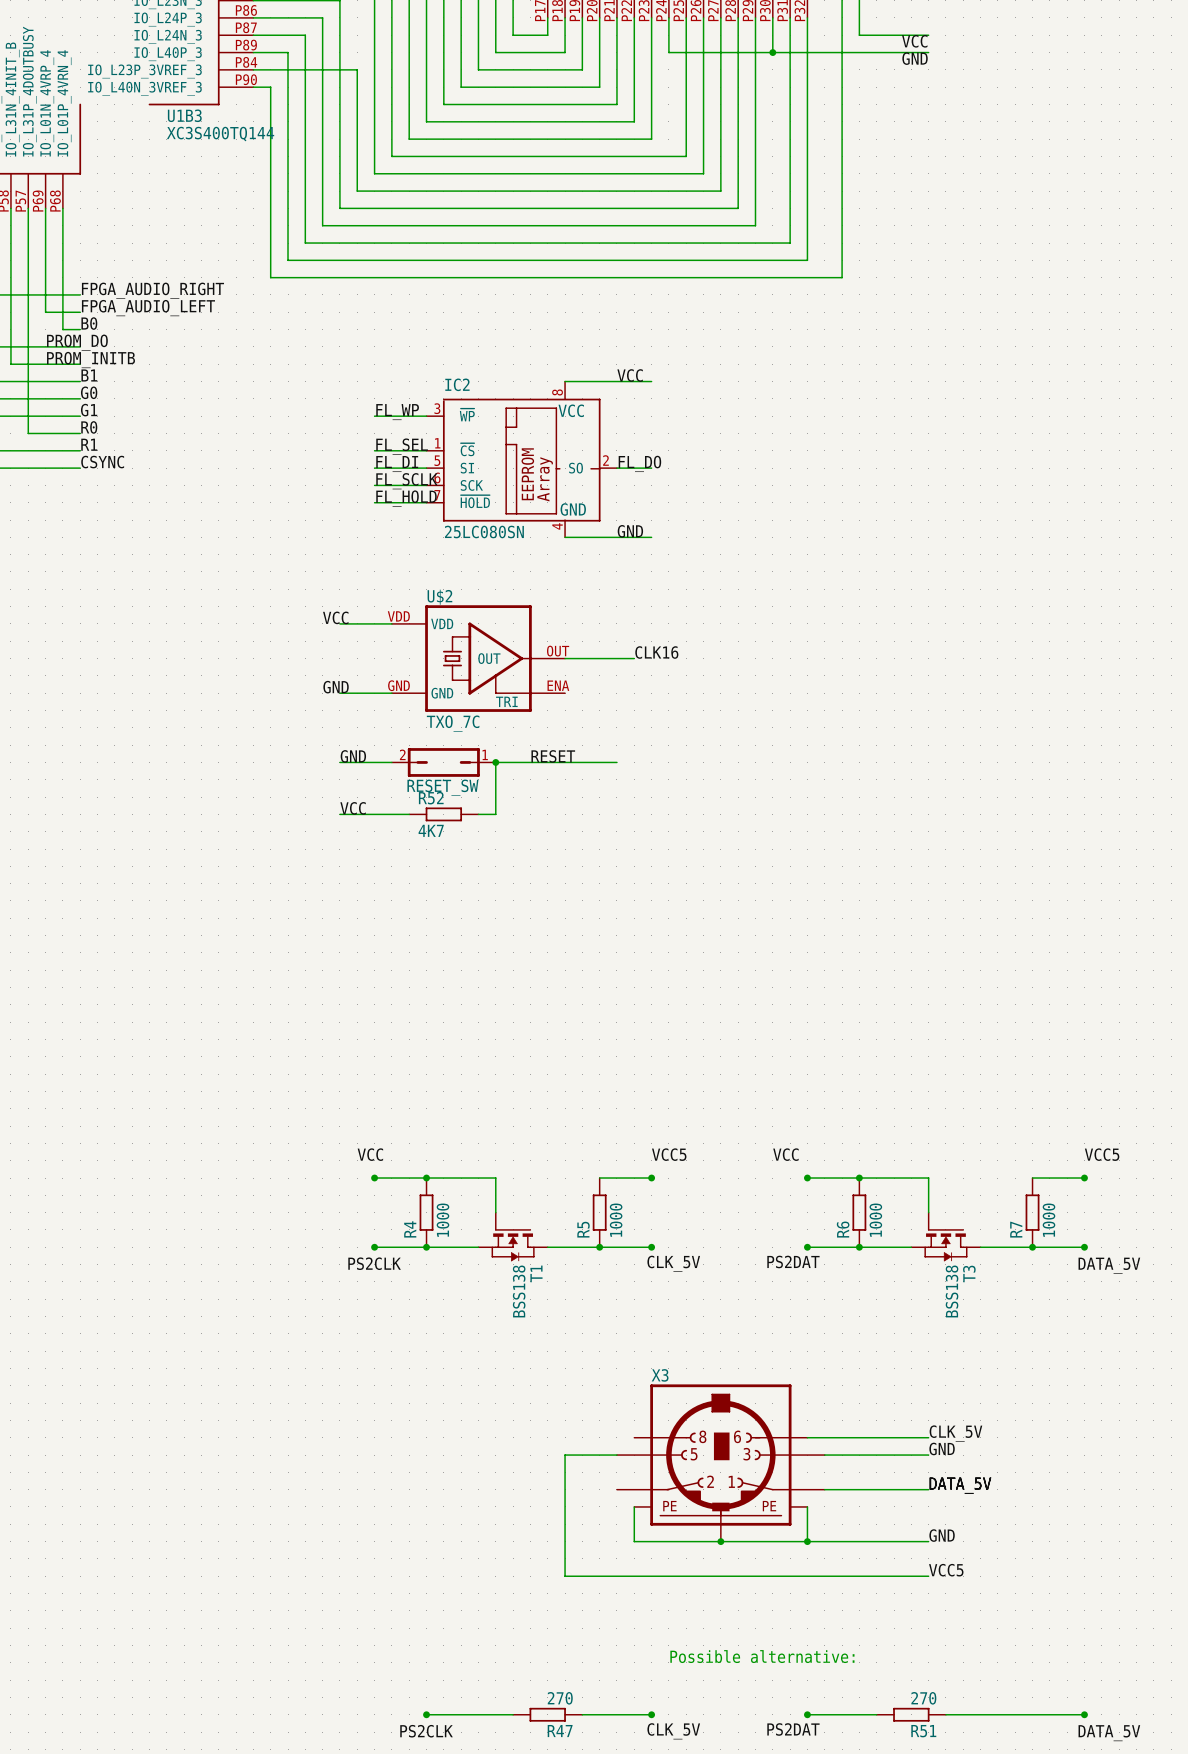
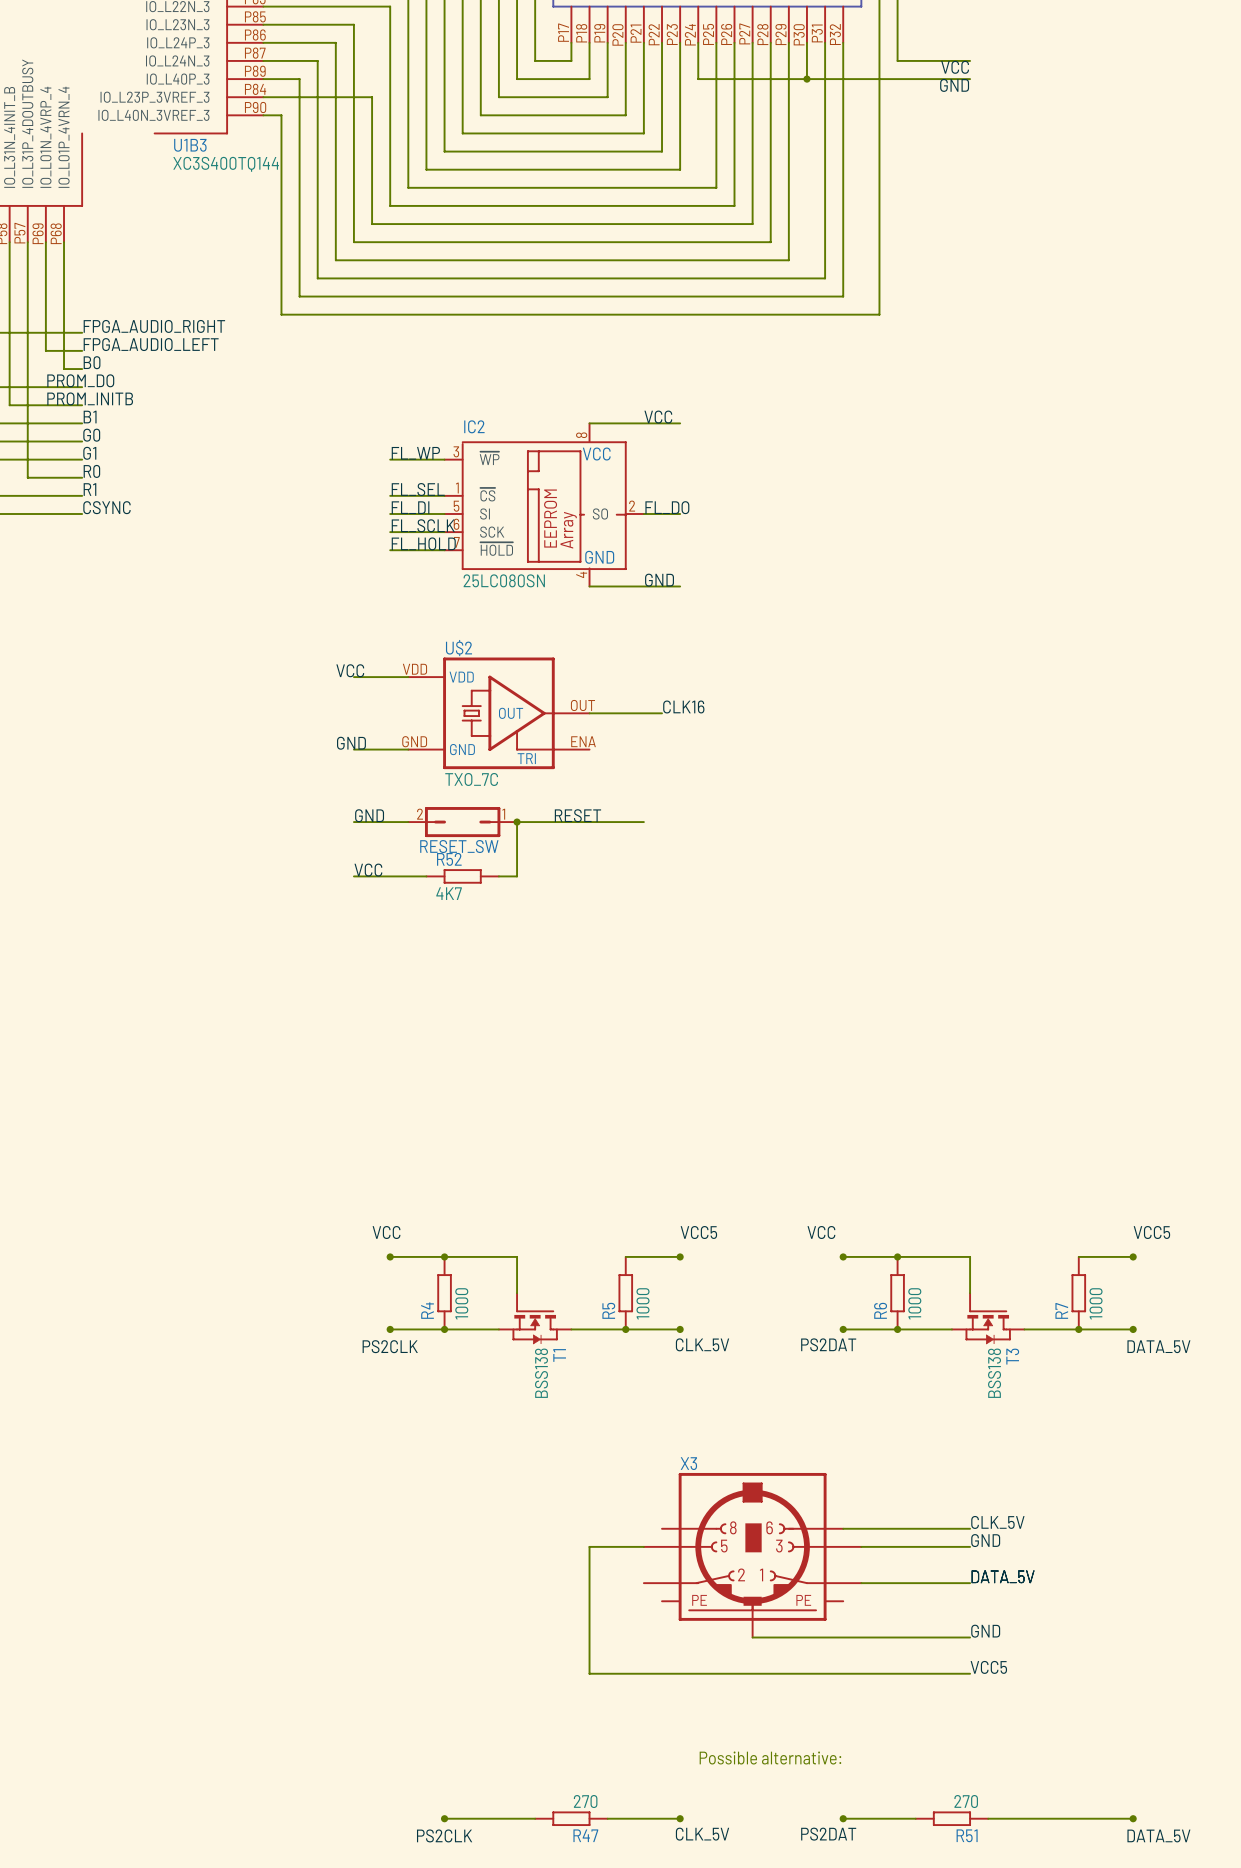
wire: (634, 1506) (634, 1541) (720, 1541) -> none
wire: (807, 1506) (807, 1541) -> none
junction: (720, 1541) -> none
junction: (807, 1541) -> none

